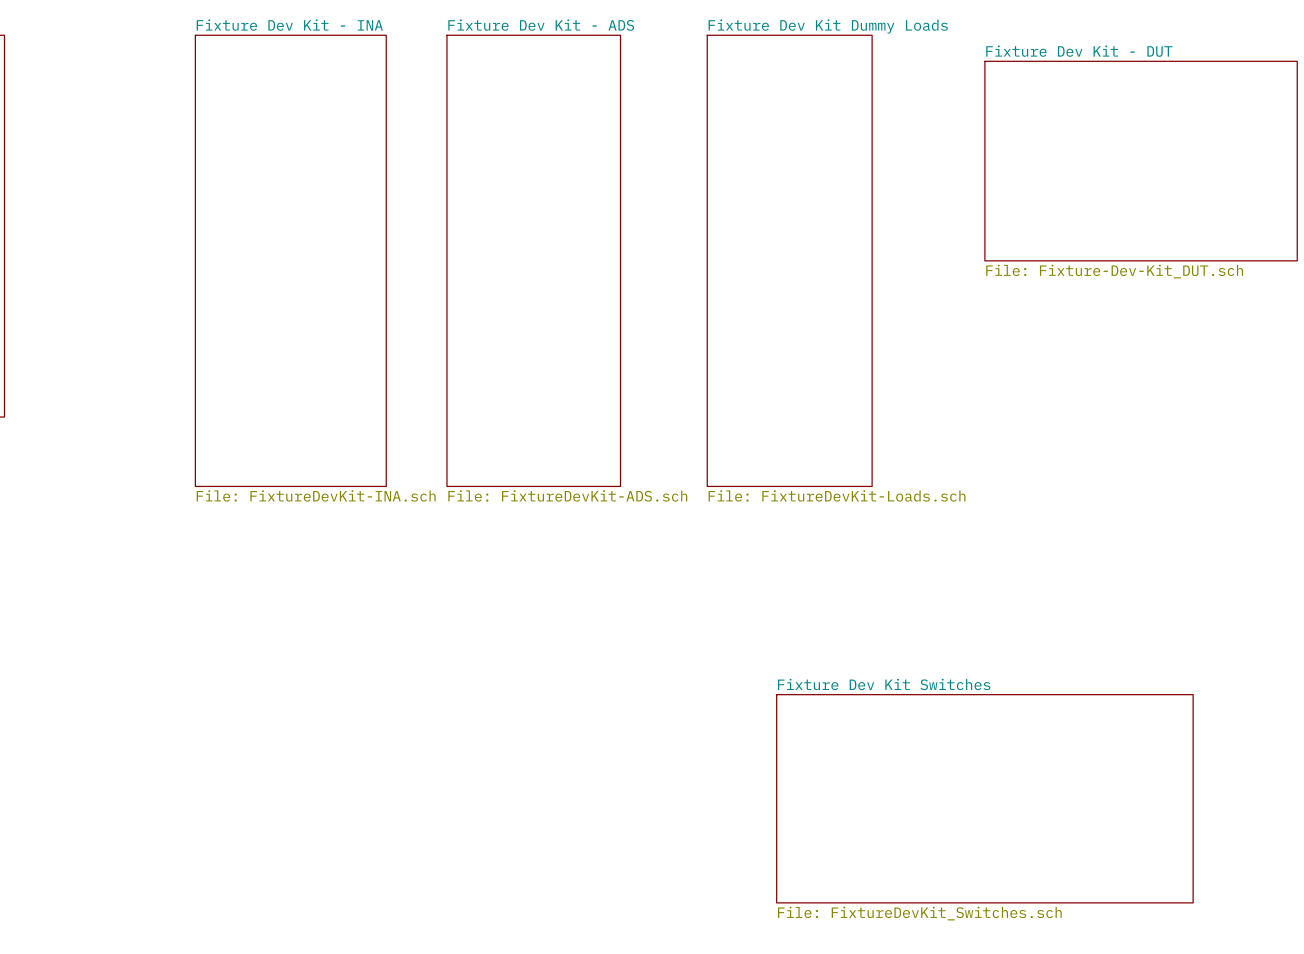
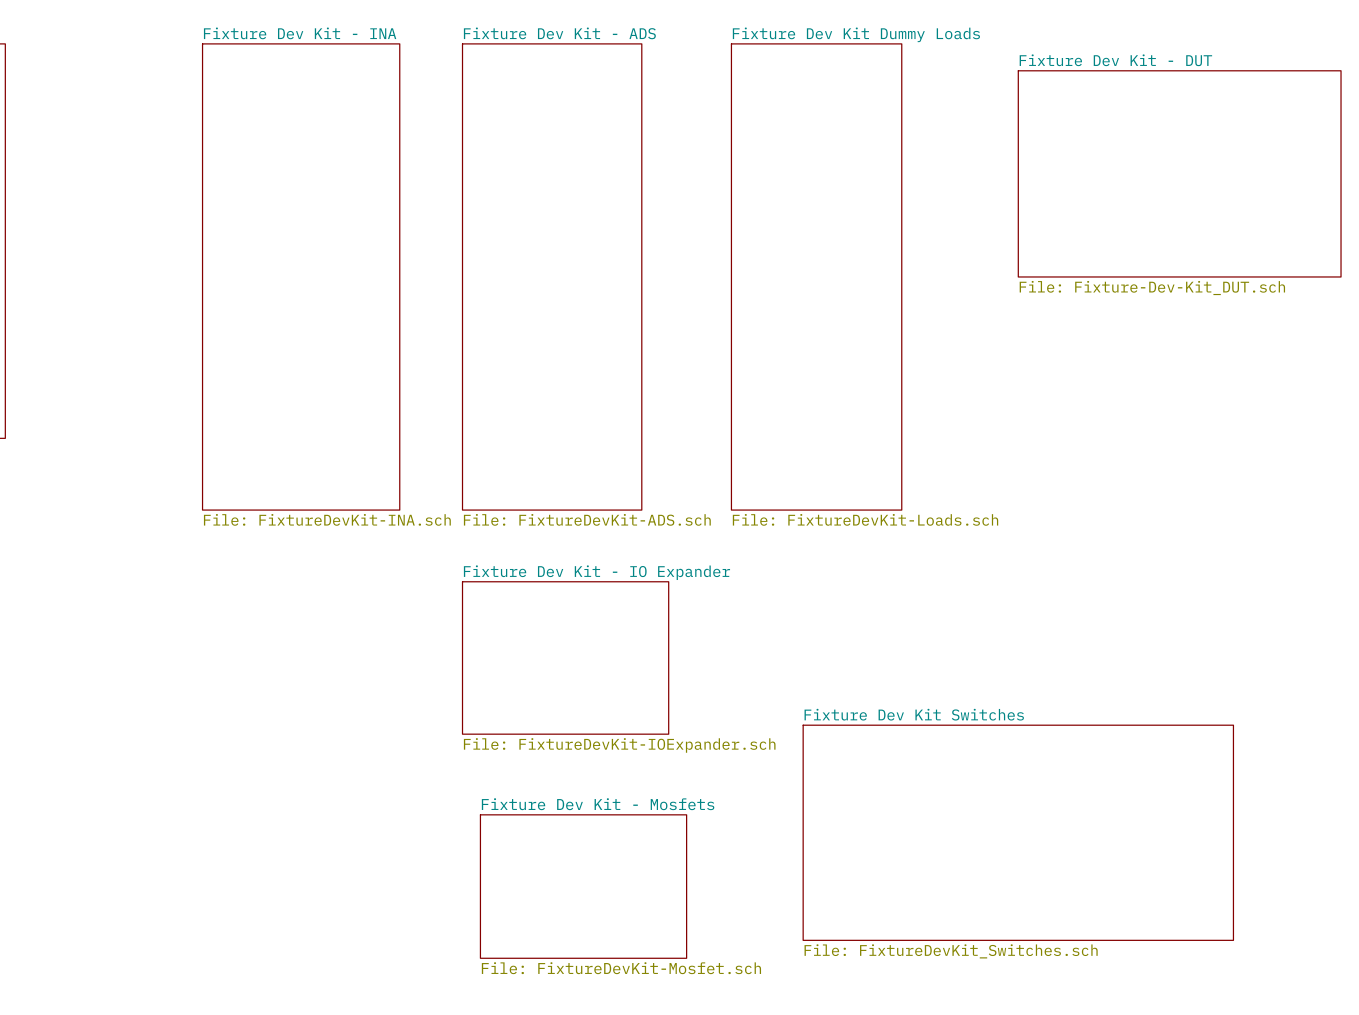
sheet Fixture Dev Kit - IO Expander: none -> File: FixtureDevKit-IOExpander.sch (565, 657)
sheet Fixture Dev Kit - Mosfets: none -> File: FixtureDevKit-Mosfet.sch (583, 886)

